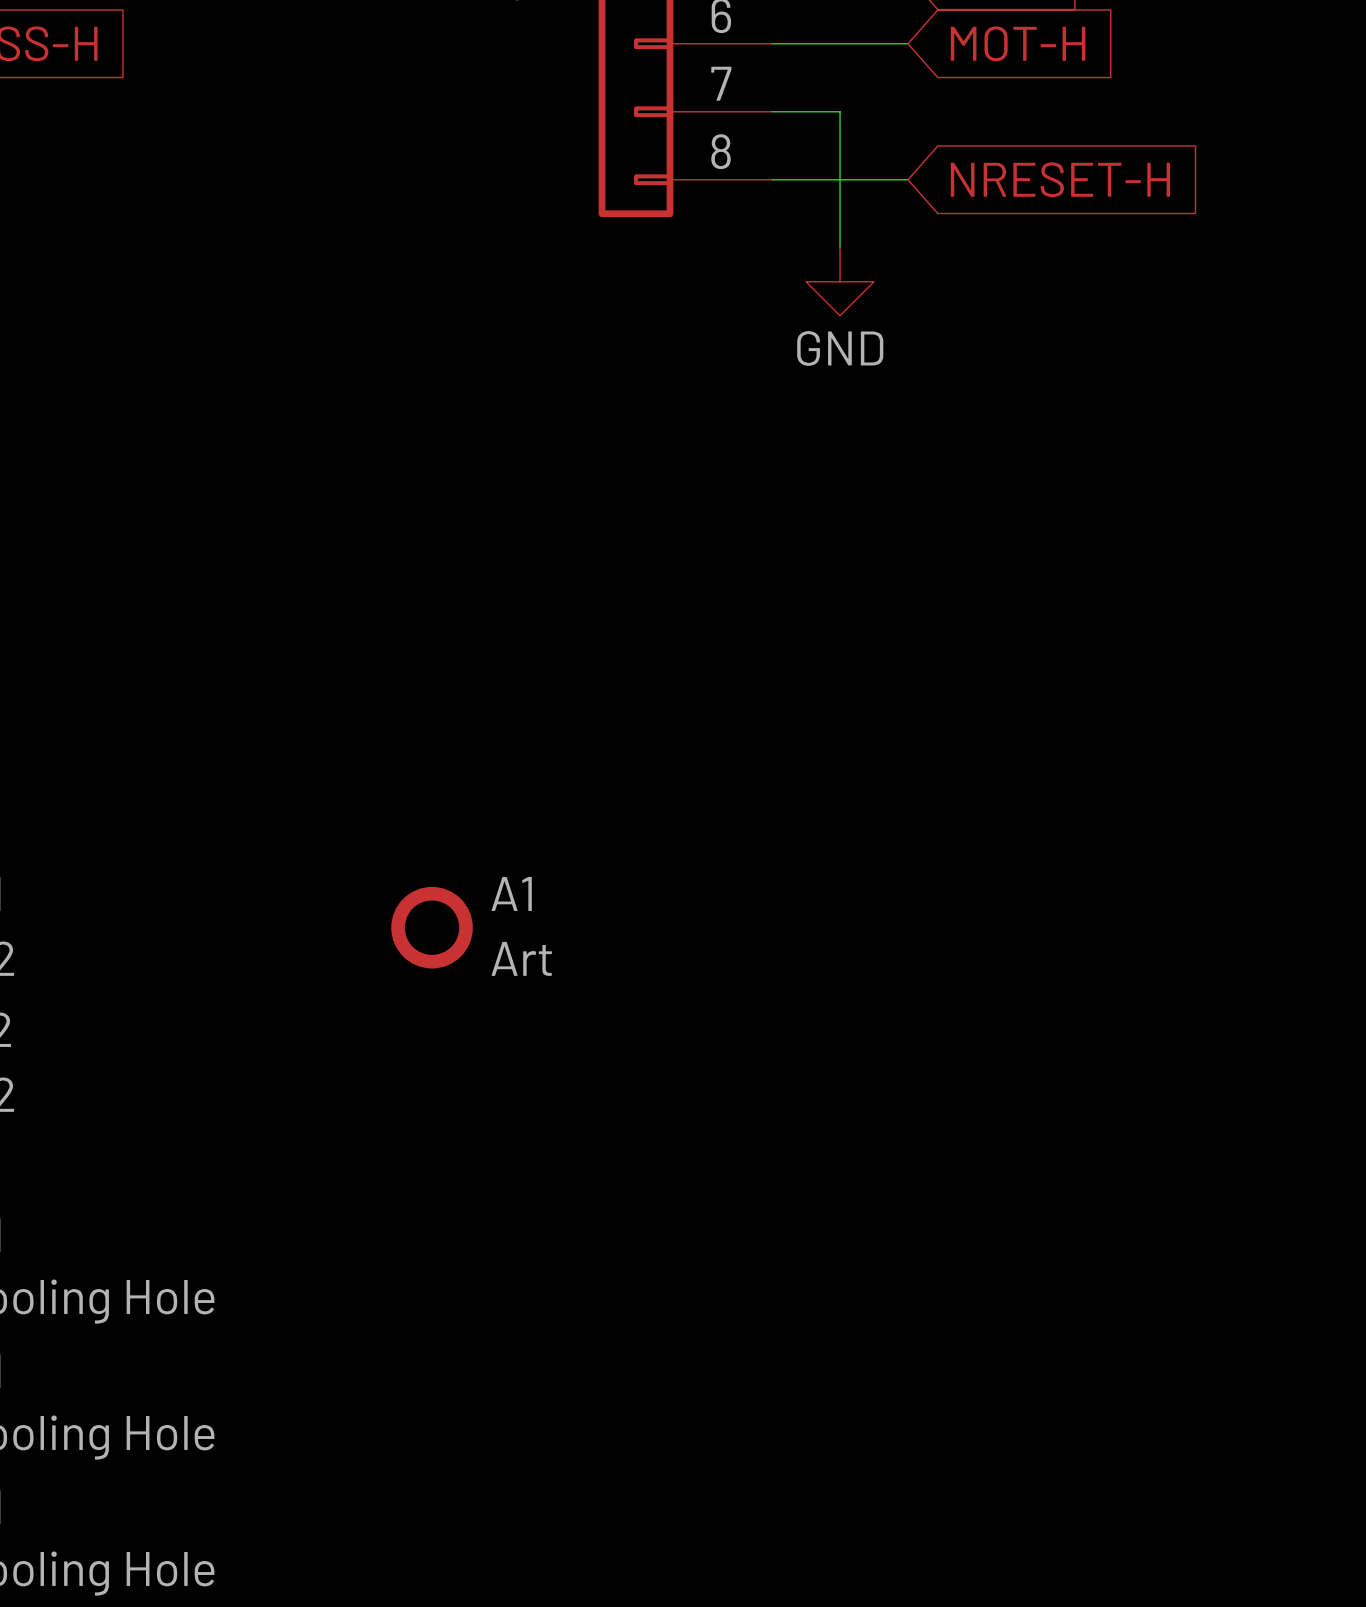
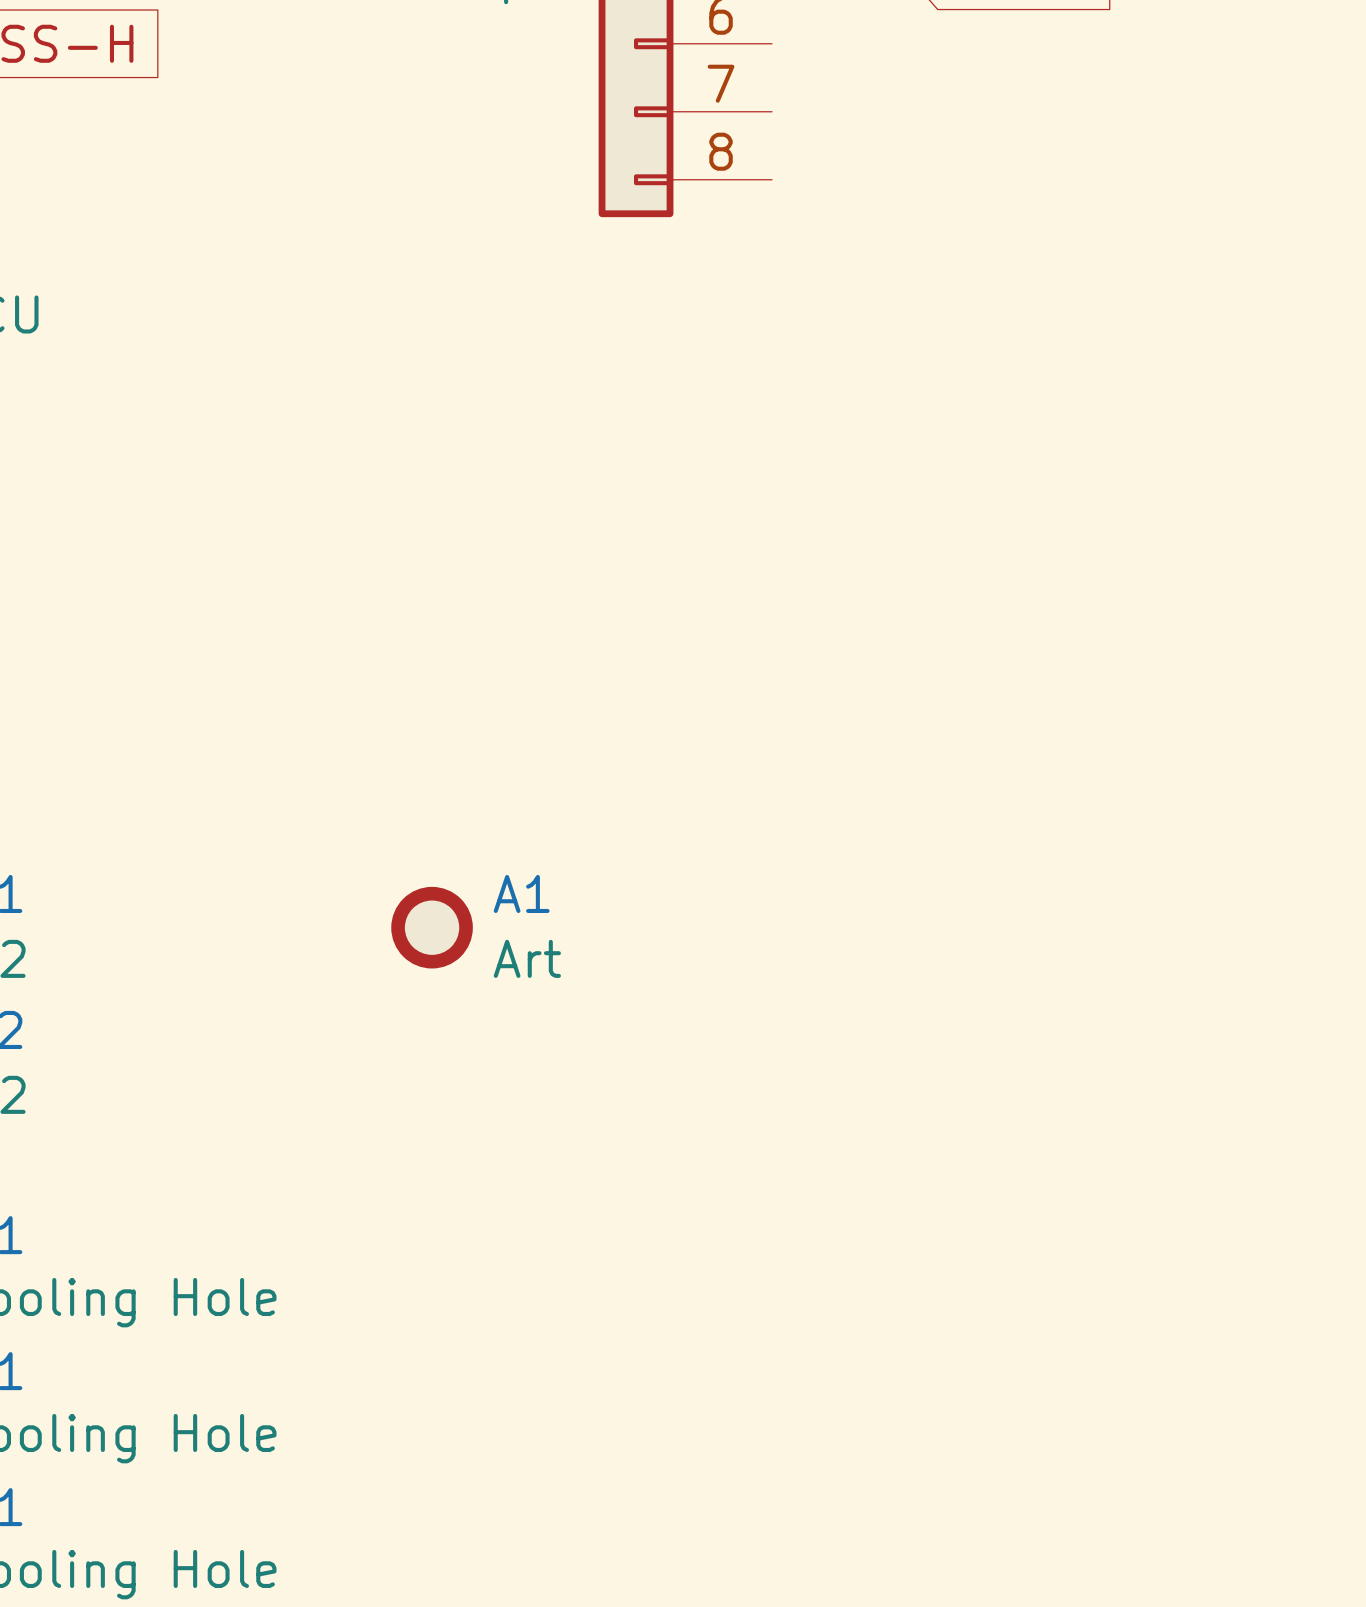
wire: (772, 43) (908, 43) -> none
global label: MOT-H (1018, 43) -> none
wire: (772, 111) (840, 111) (840, 247) -> none
wire: (772, 179) (908, 179) -> none
global label: NRESET-H (1060, 179) -> none
power symbol: GND (840, 281) -> none

